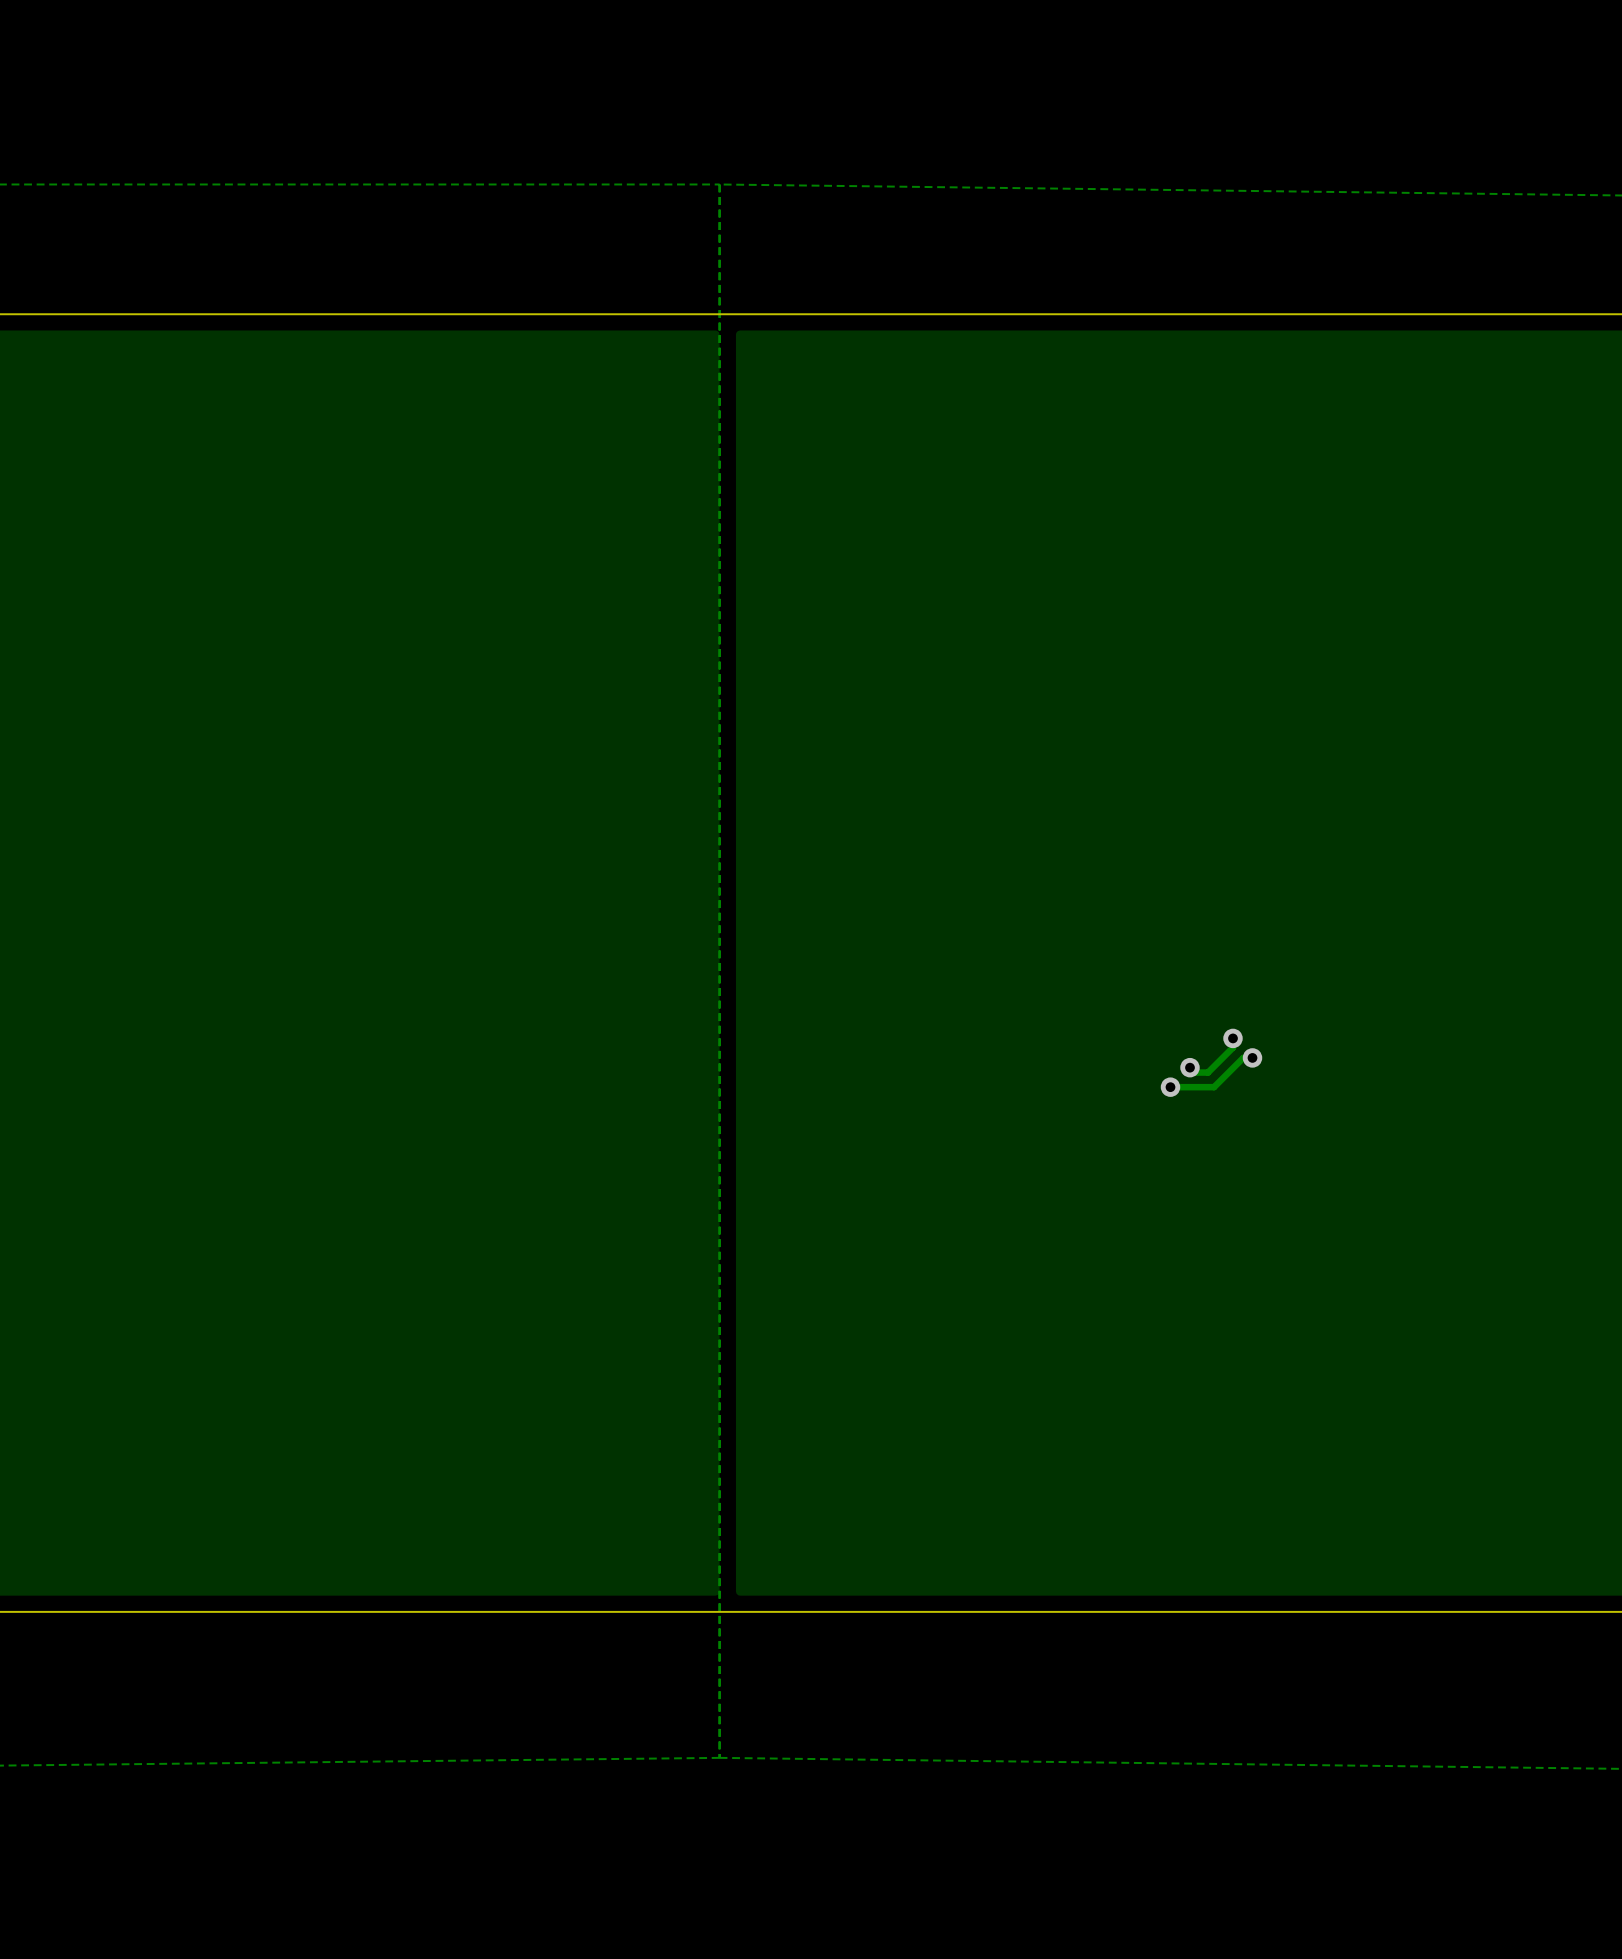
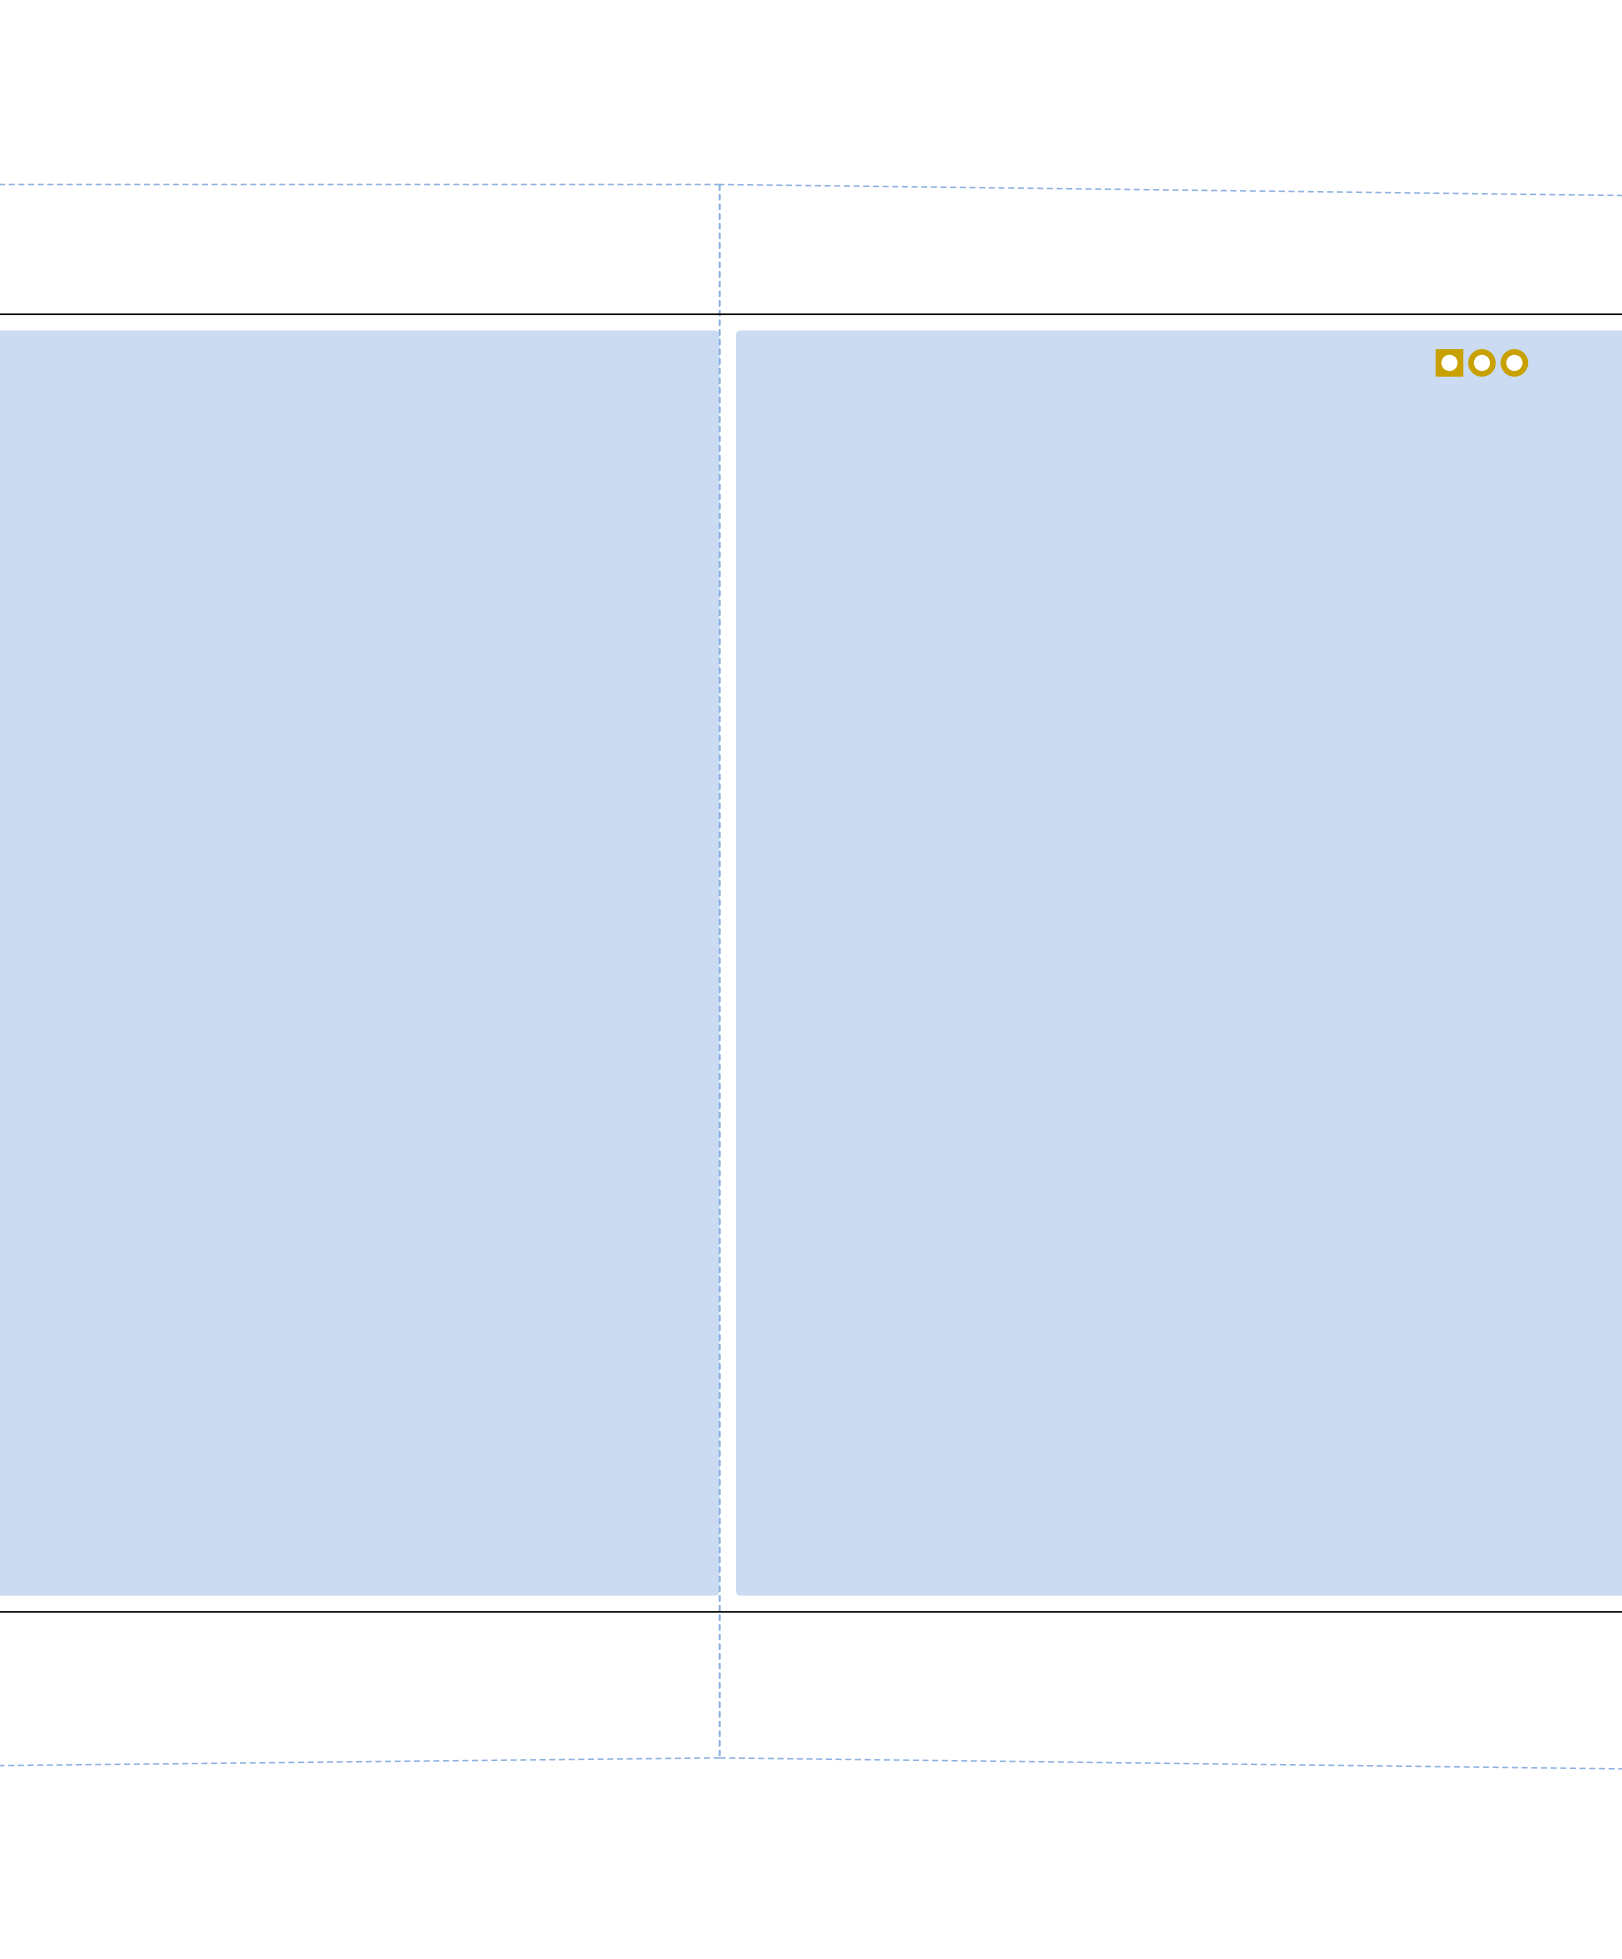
part: none -> (1481, 362)
track: (1232, 1038) (1232, 1047) (1208, 1072) (1194, 1072) (1190, 1067) -> none
via: (1232, 1038) -> none
track: (1252, 1057) (1243, 1057) (1214, 1087) (1170, 1087) -> none
via: (1252, 1057) -> none
via: (1190, 1067) -> none
via: (1170, 1087) -> none

